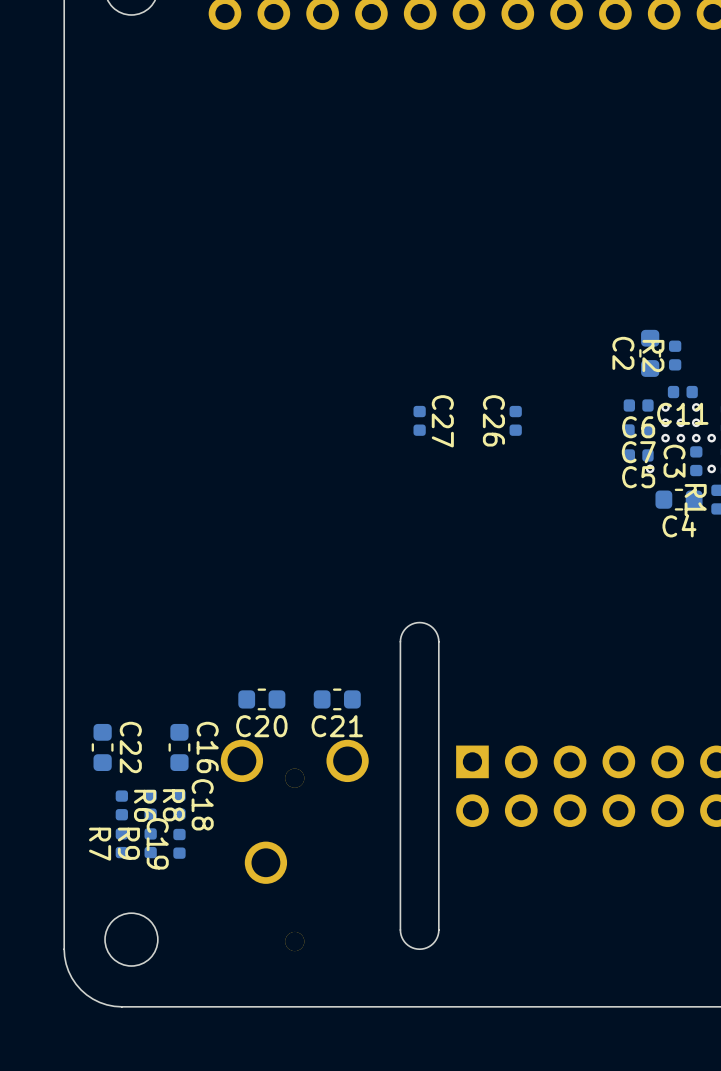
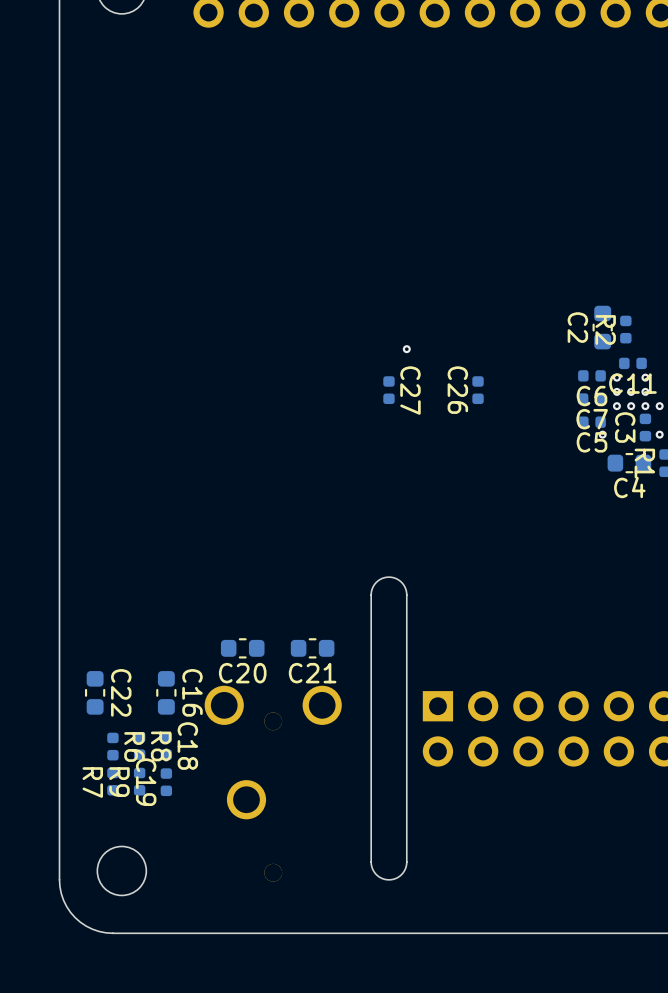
via: none -> (406, 349)

